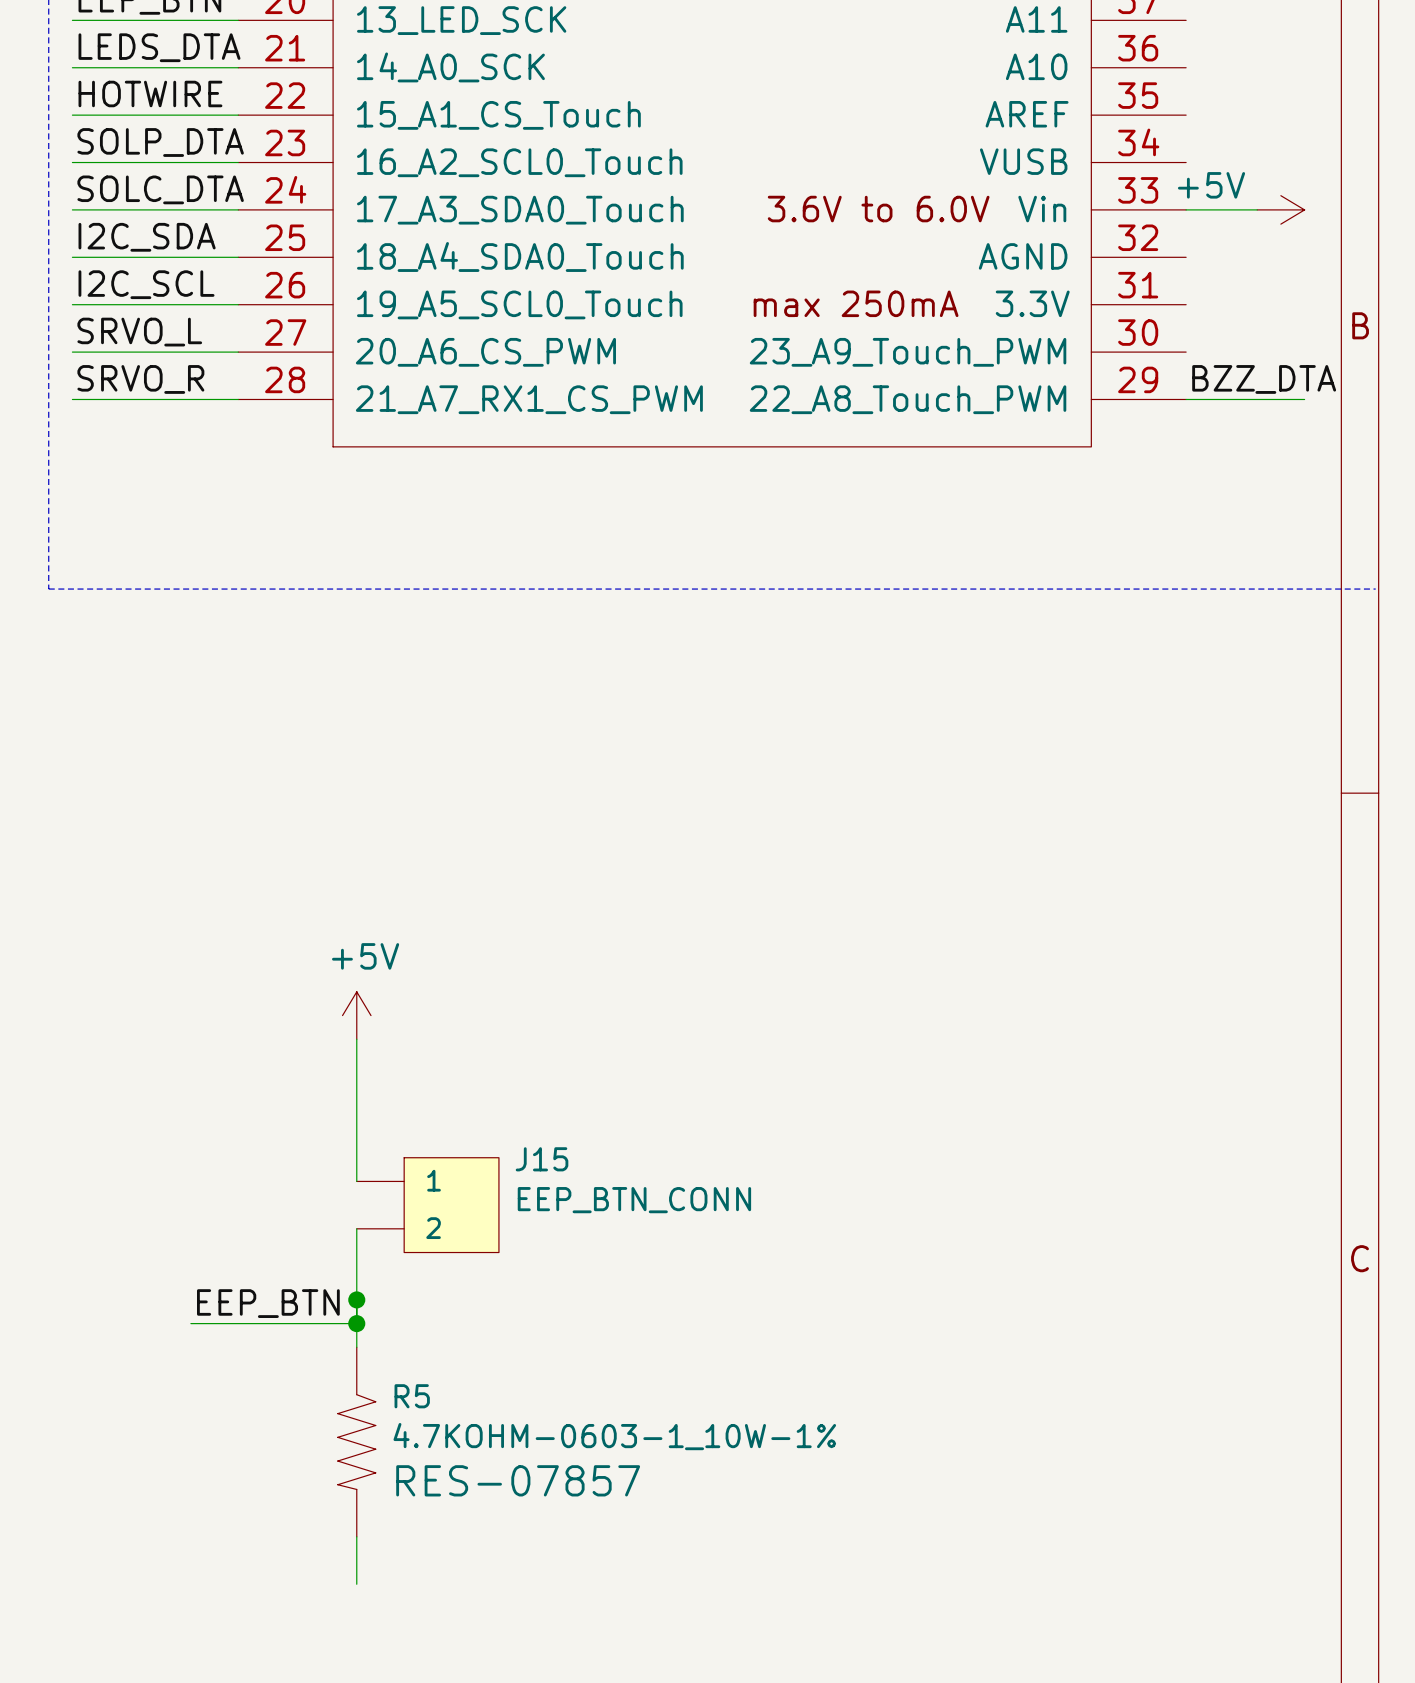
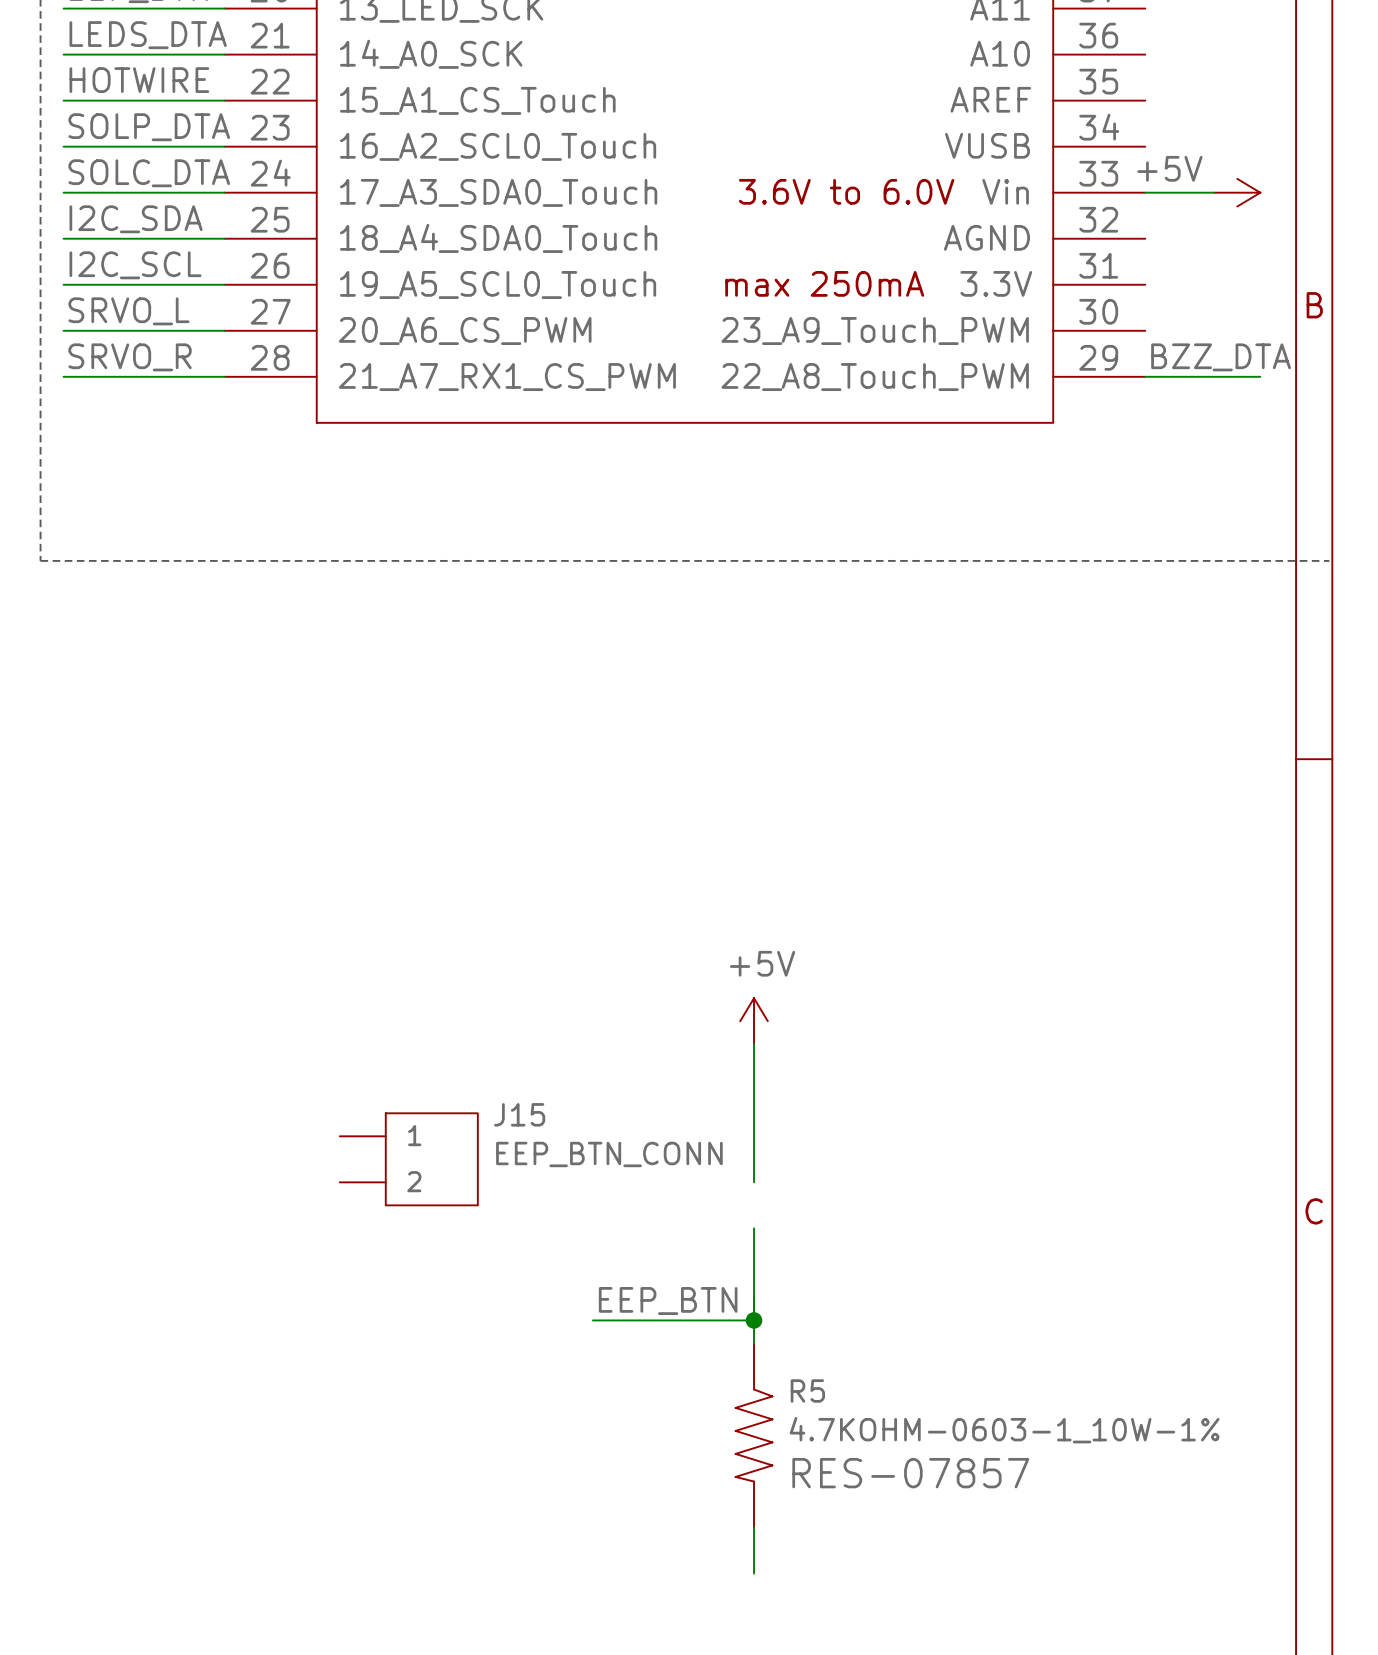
power symbol position: +5V (356, 1015) -> +5V (754, 1021)
wire: (356, 1039) (356, 1181) -> (754, 1044) (754, 1182)
wire: (356, 1228) (356, 1347) -> (754, 1228) (754, 1343)
junction: (356, 1299) -> none
label position: EEP_BTN (268, 1303) -> EEP_BTN (668, 1300)
wire: (190, 1323) (356, 1323) -> (592, 1320) (754, 1320)
junction: (356, 1323) -> none
junction: none -> (754, 1320)
R5 position: (356, 1442) -> (754, 1435)
wire: (356, 1536) (356, 1584) -> (754, 1527) (754, 1573)

